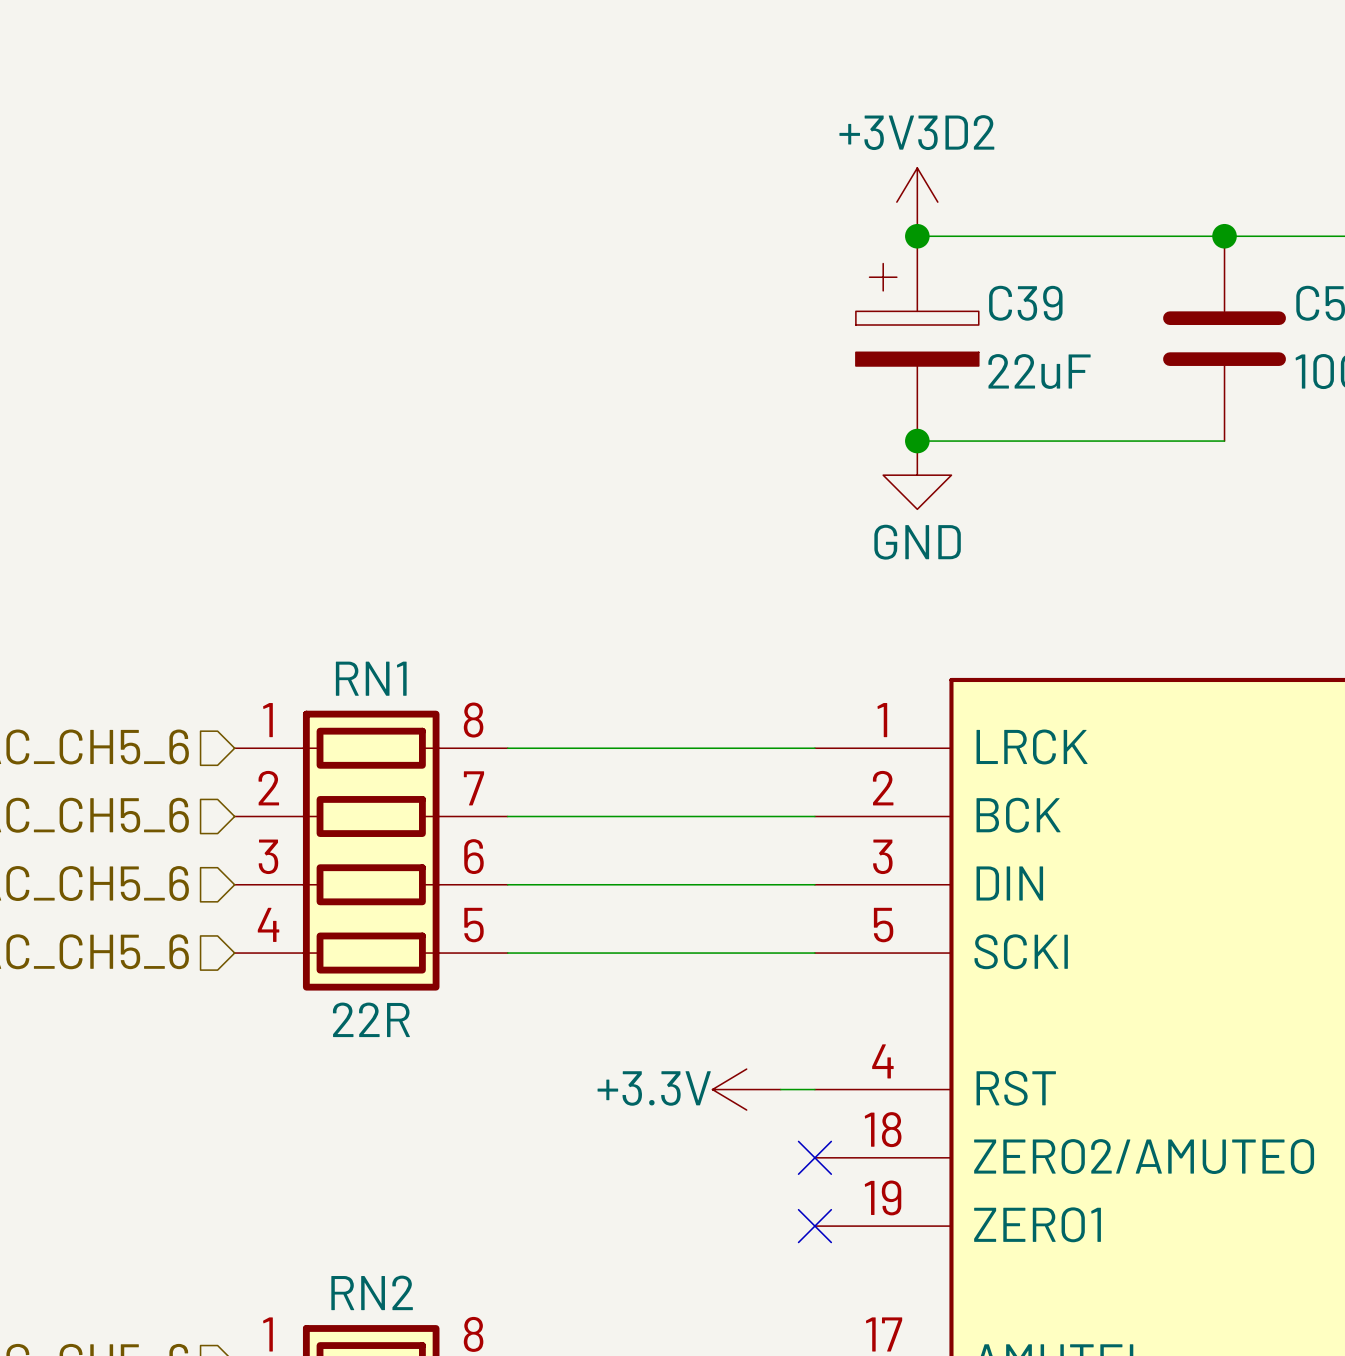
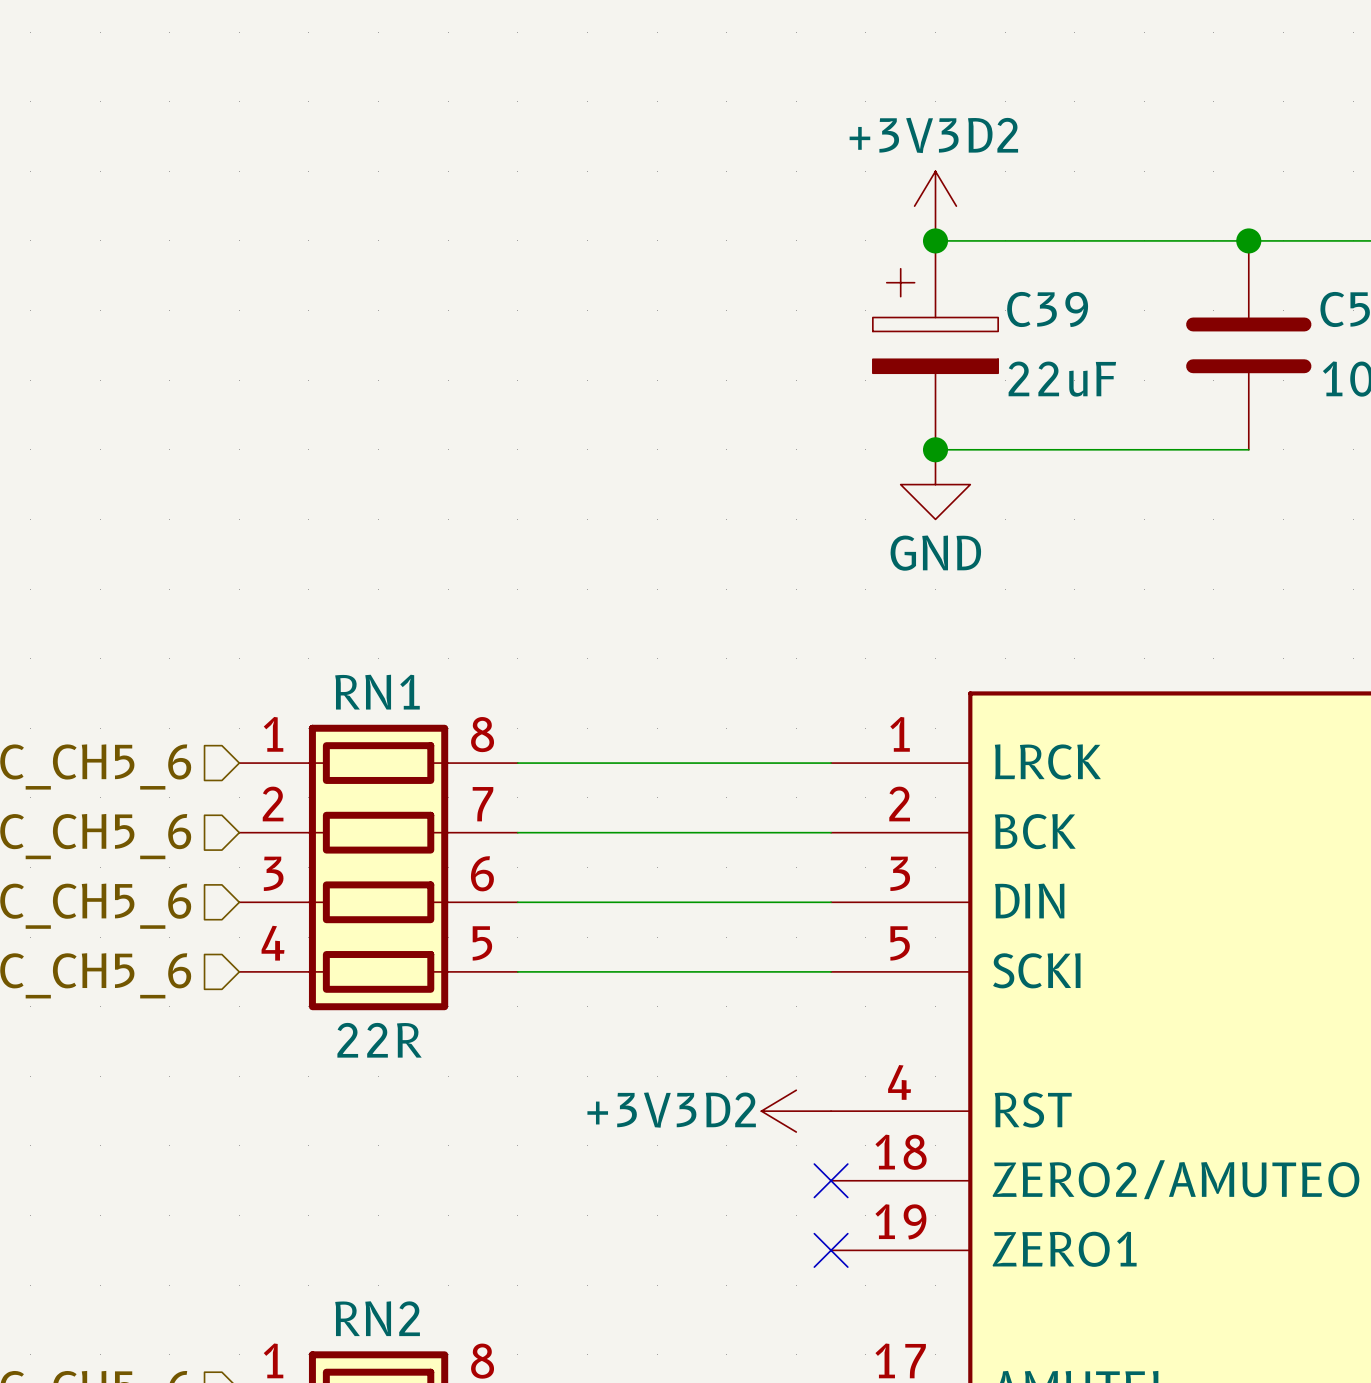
power symbol: +3.3V (746, 1089) -> none
power symbol: none -> +3V3D2 (796, 1111)

